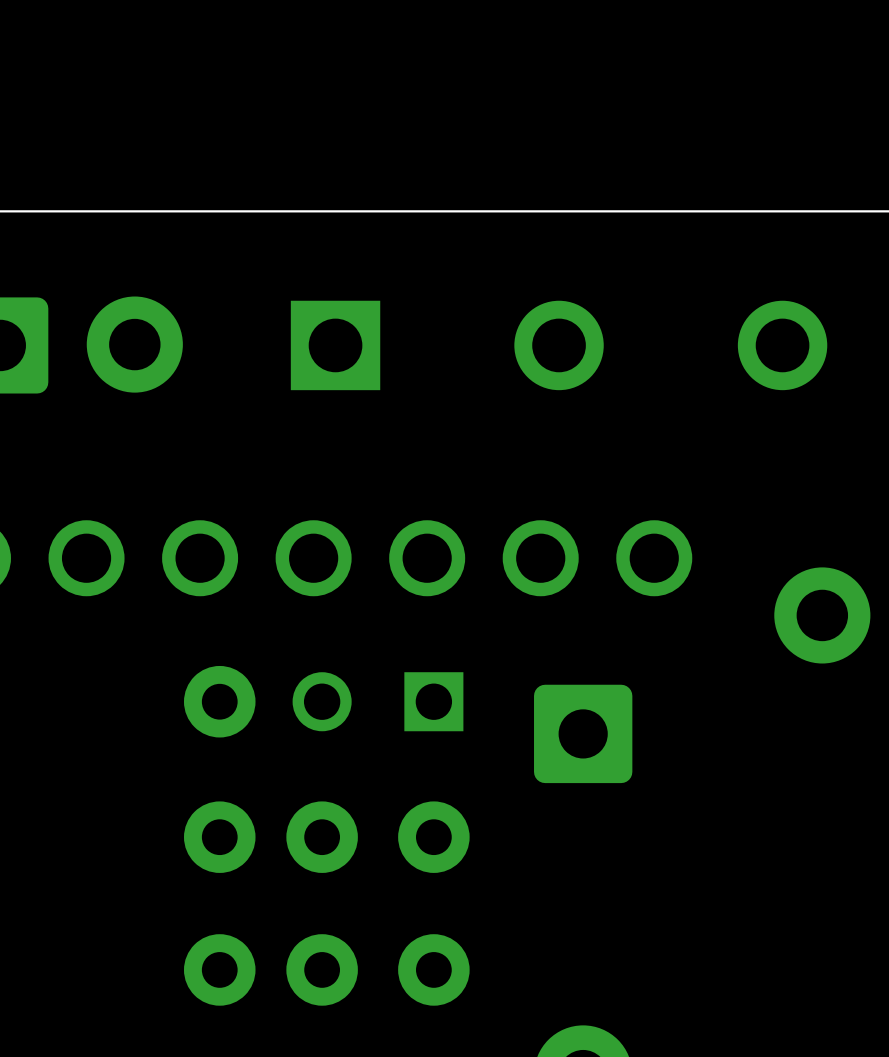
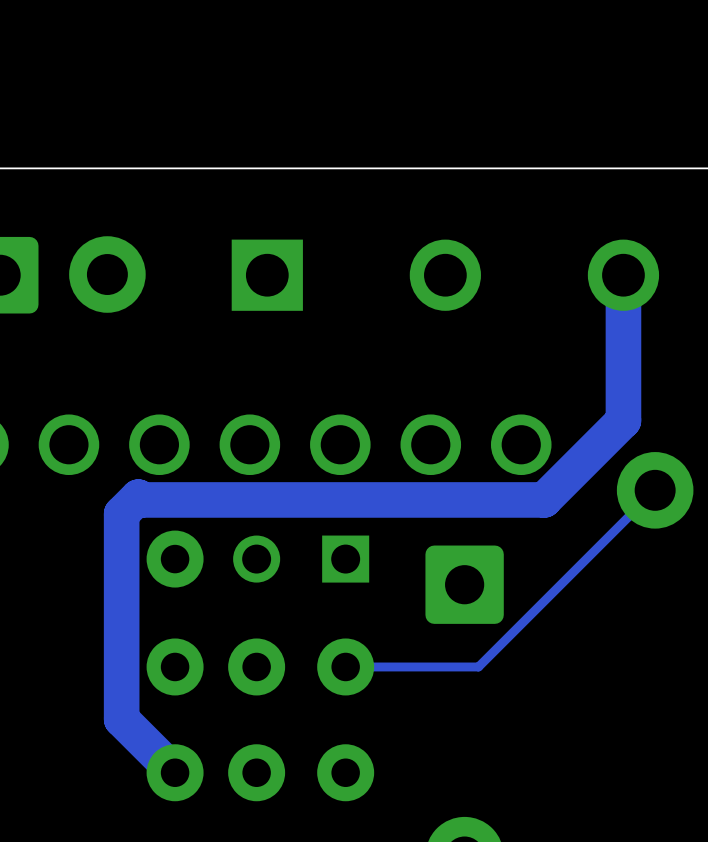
track: none -> (623, 275) (623, 420) (544, 499) (141, 499) (138, 497) (121, 513) (121, 719) (175, 772)
track: none -> (655, 490) (478, 666) (345, 666)

